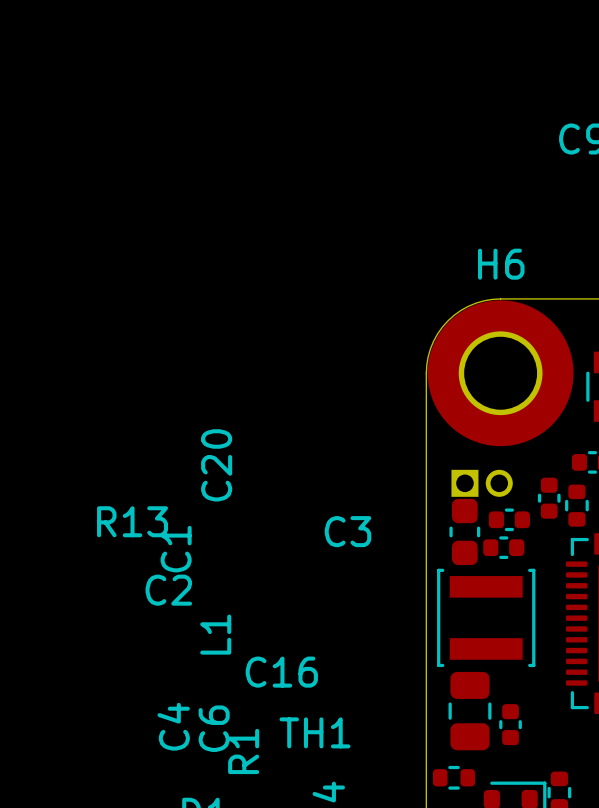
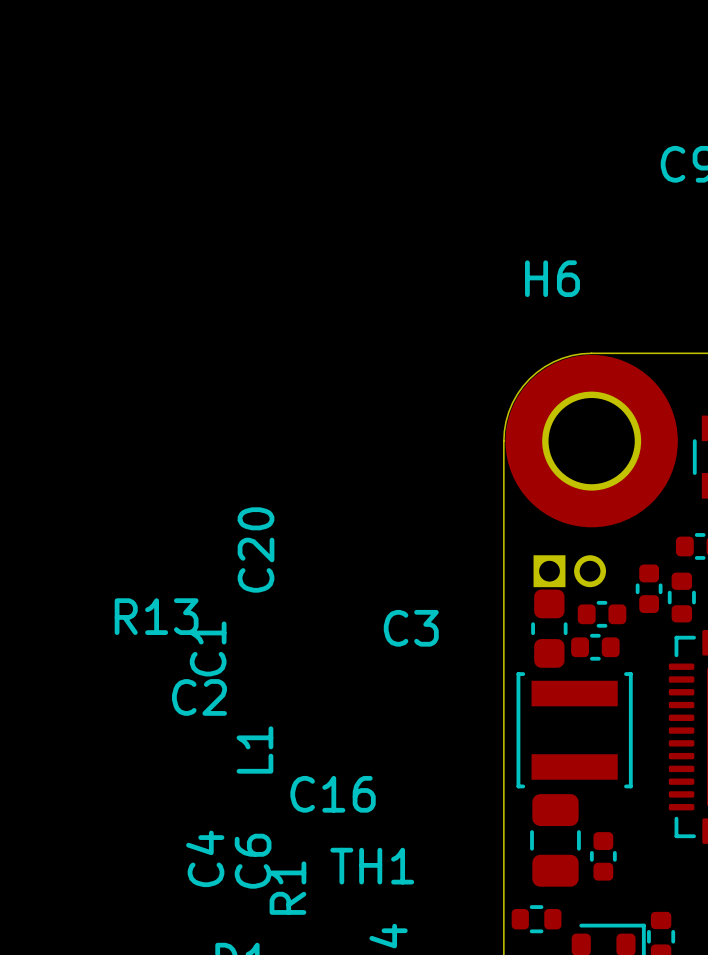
H6 name position: H6 (501, 264) -> H6 (552, 278)

